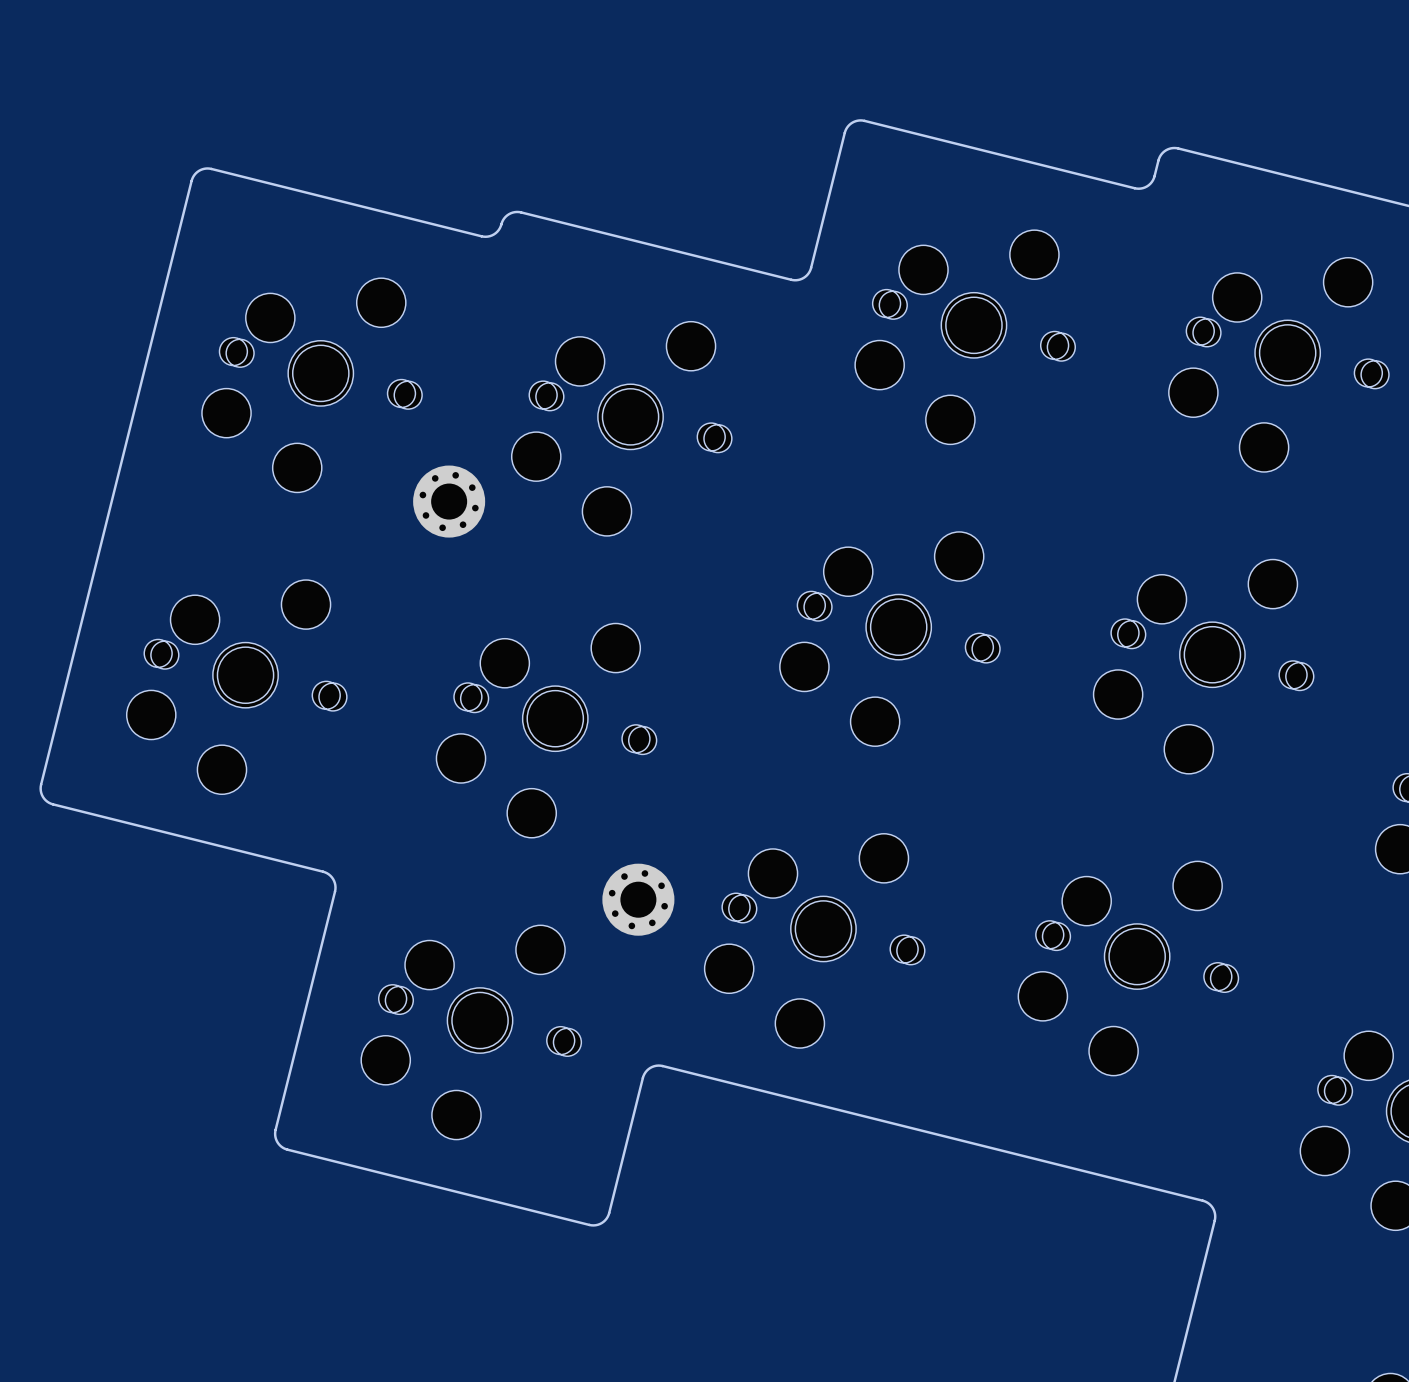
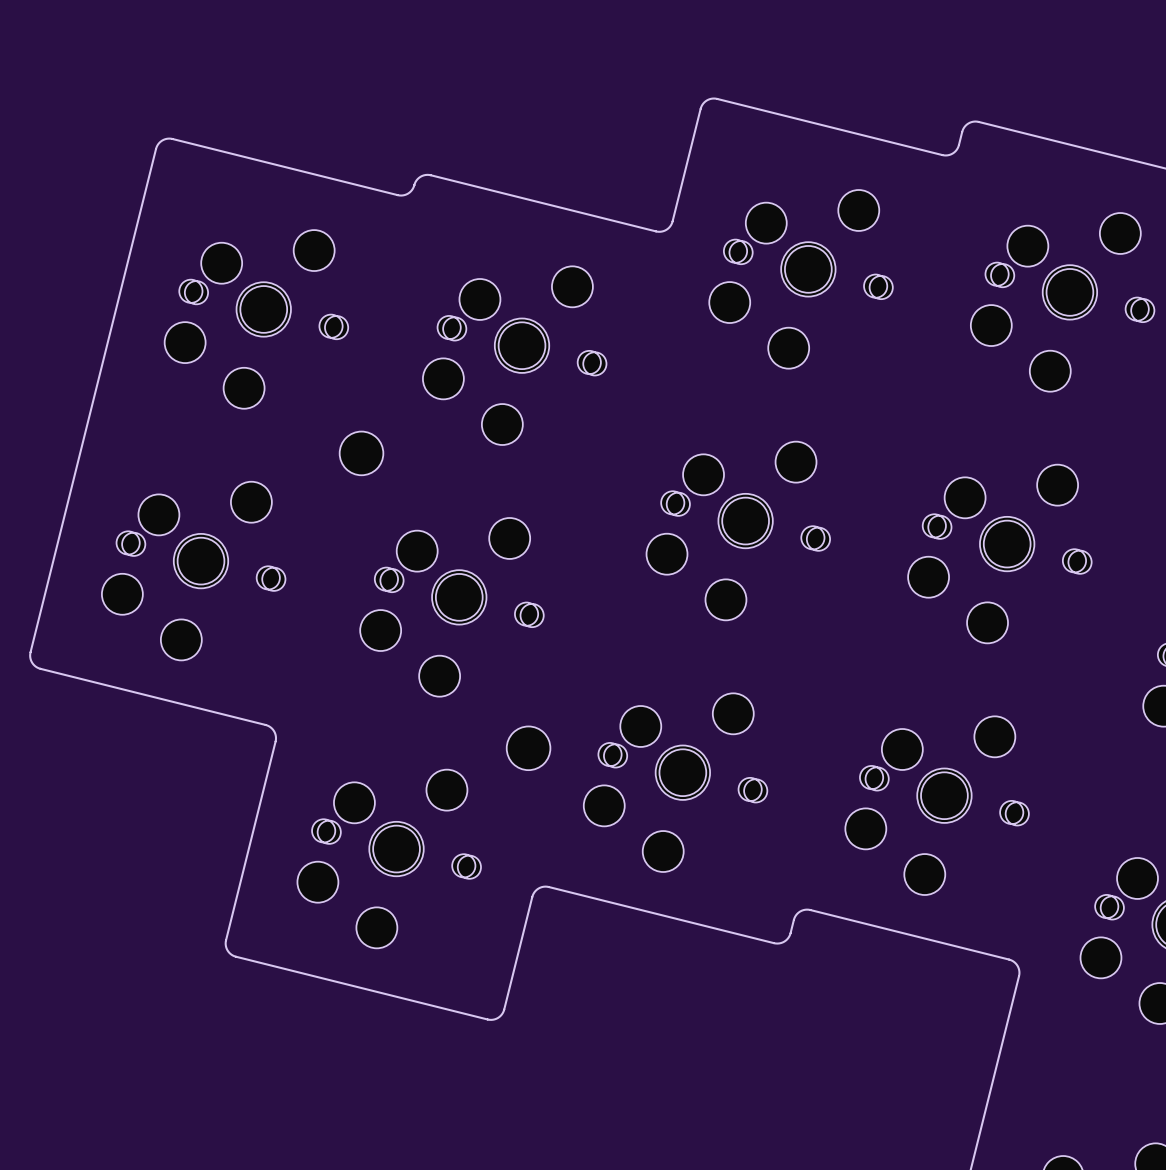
part: (449, 501) -> none
part: none -> (361, 453)
part footprint: [602, 863, 675, 936] -> [506, 726, 551, 771]
board edge: (932, 1133) (1202, 1200) (1212, 1208) (1214, 1220) -> (774, 943) (781, 943) (787, 939) (796, 915) (801, 910) (808, 909) (1009, 959) (1016, 964) (1019, 973) (1009, 1015)

